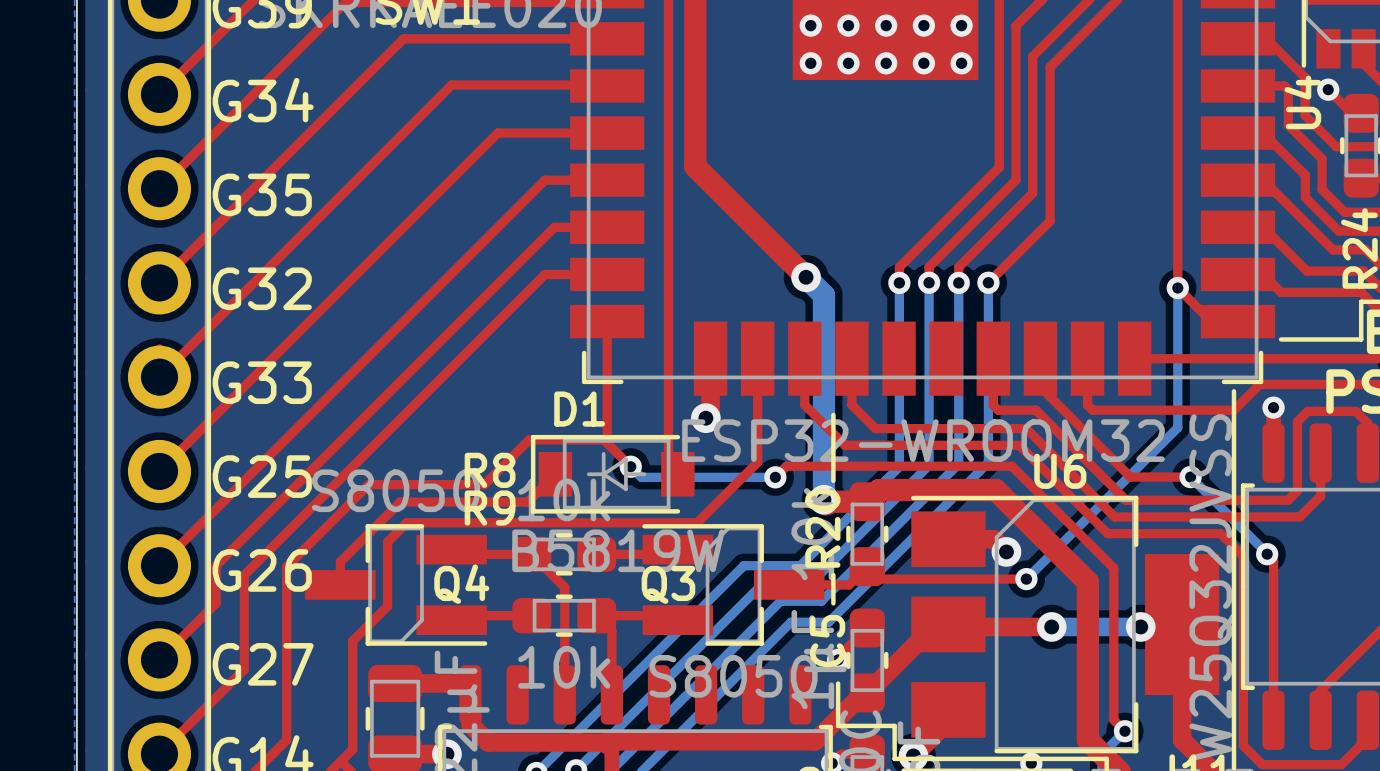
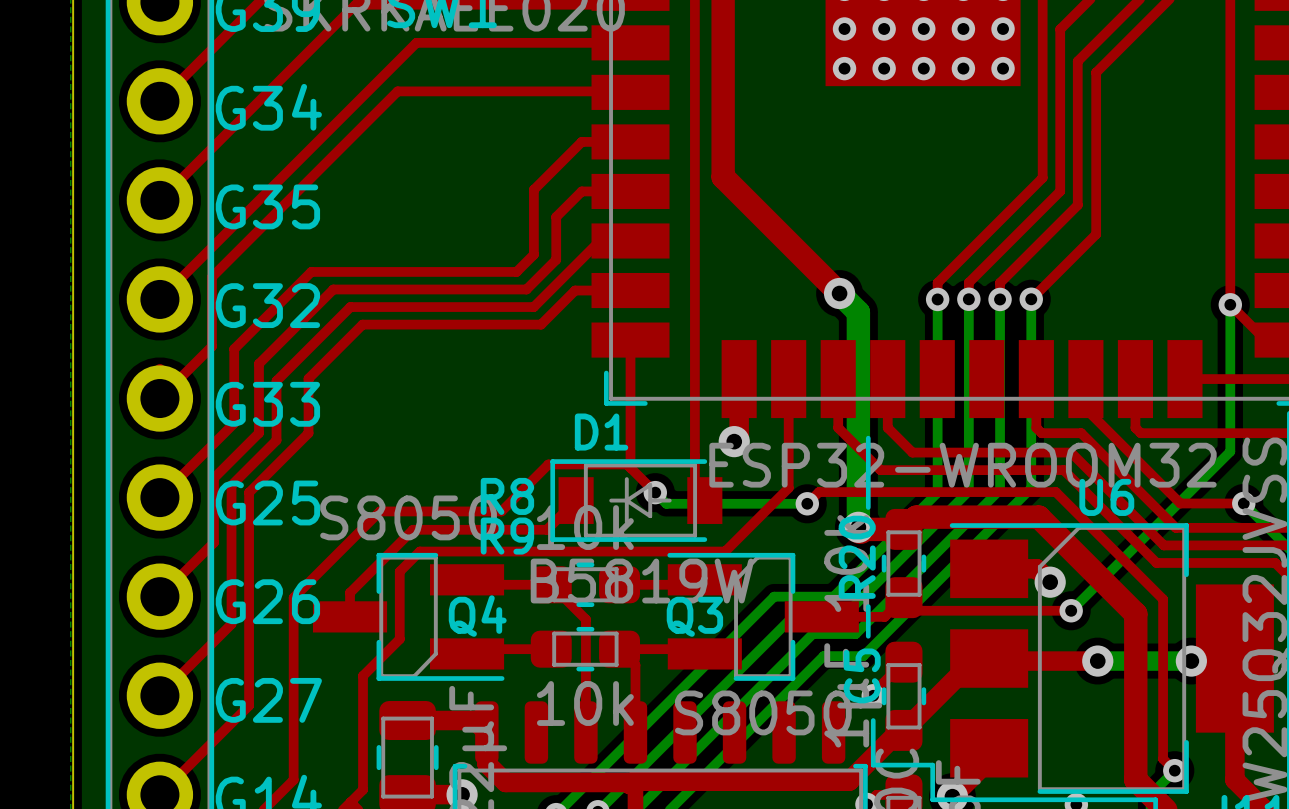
top track: (451, 85) (208, 327) -> (467, 91) (397, 91) (211, 277) (211, 346)
top track: (560, 133) (497, 133) (340, 290) -> (599, 240) (533, 307) (350, 307)
top track: none -> (581, 141) (533, 189) (533, 254) (516, 271) (311, 271) (234, 349) (234, 423)
top track: (560, 180) (544, 180) (210, 514) -> none
top track: (578, 227) (554, 227) (536, 245) -> (581, 191) (556, 217) (556, 259)
top track: (508, 273) (216, 565) (216, 603) -> (526, 289) (333, 289) (258, 363) (258, 433) (213, 478) (213, 542)
top track: (554, 274) (544, 274) (244, 575) -> (575, 290) (541, 324) (362, 324) (308, 378) (308, 433) (249, 492) (249, 606)
top track: (270, 360) (230, 400) -> (276, 380) (276, 440) (231, 485) (231, 624) (219, 636)

